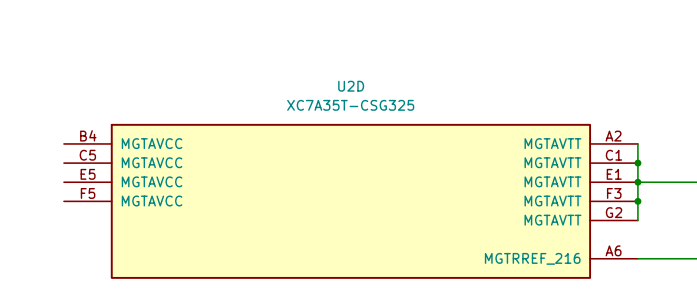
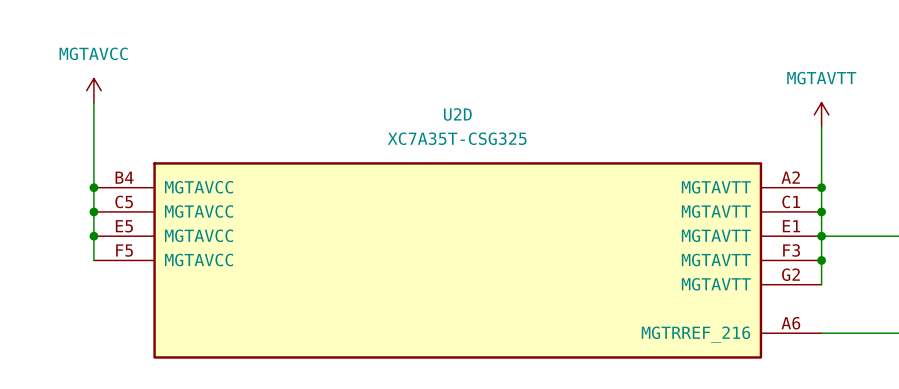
power symbol: none -> MGTAVCC (93, 90)
wire: none -> (93, 102) (93, 260)
power symbol: none -> MGTAVTT (821, 114)
wire: none -> (821, 127) (821, 187)
junction: none -> (93, 187)
junction: none -> (821, 187)
junction: none -> (93, 211)
junction: none -> (93, 236)

